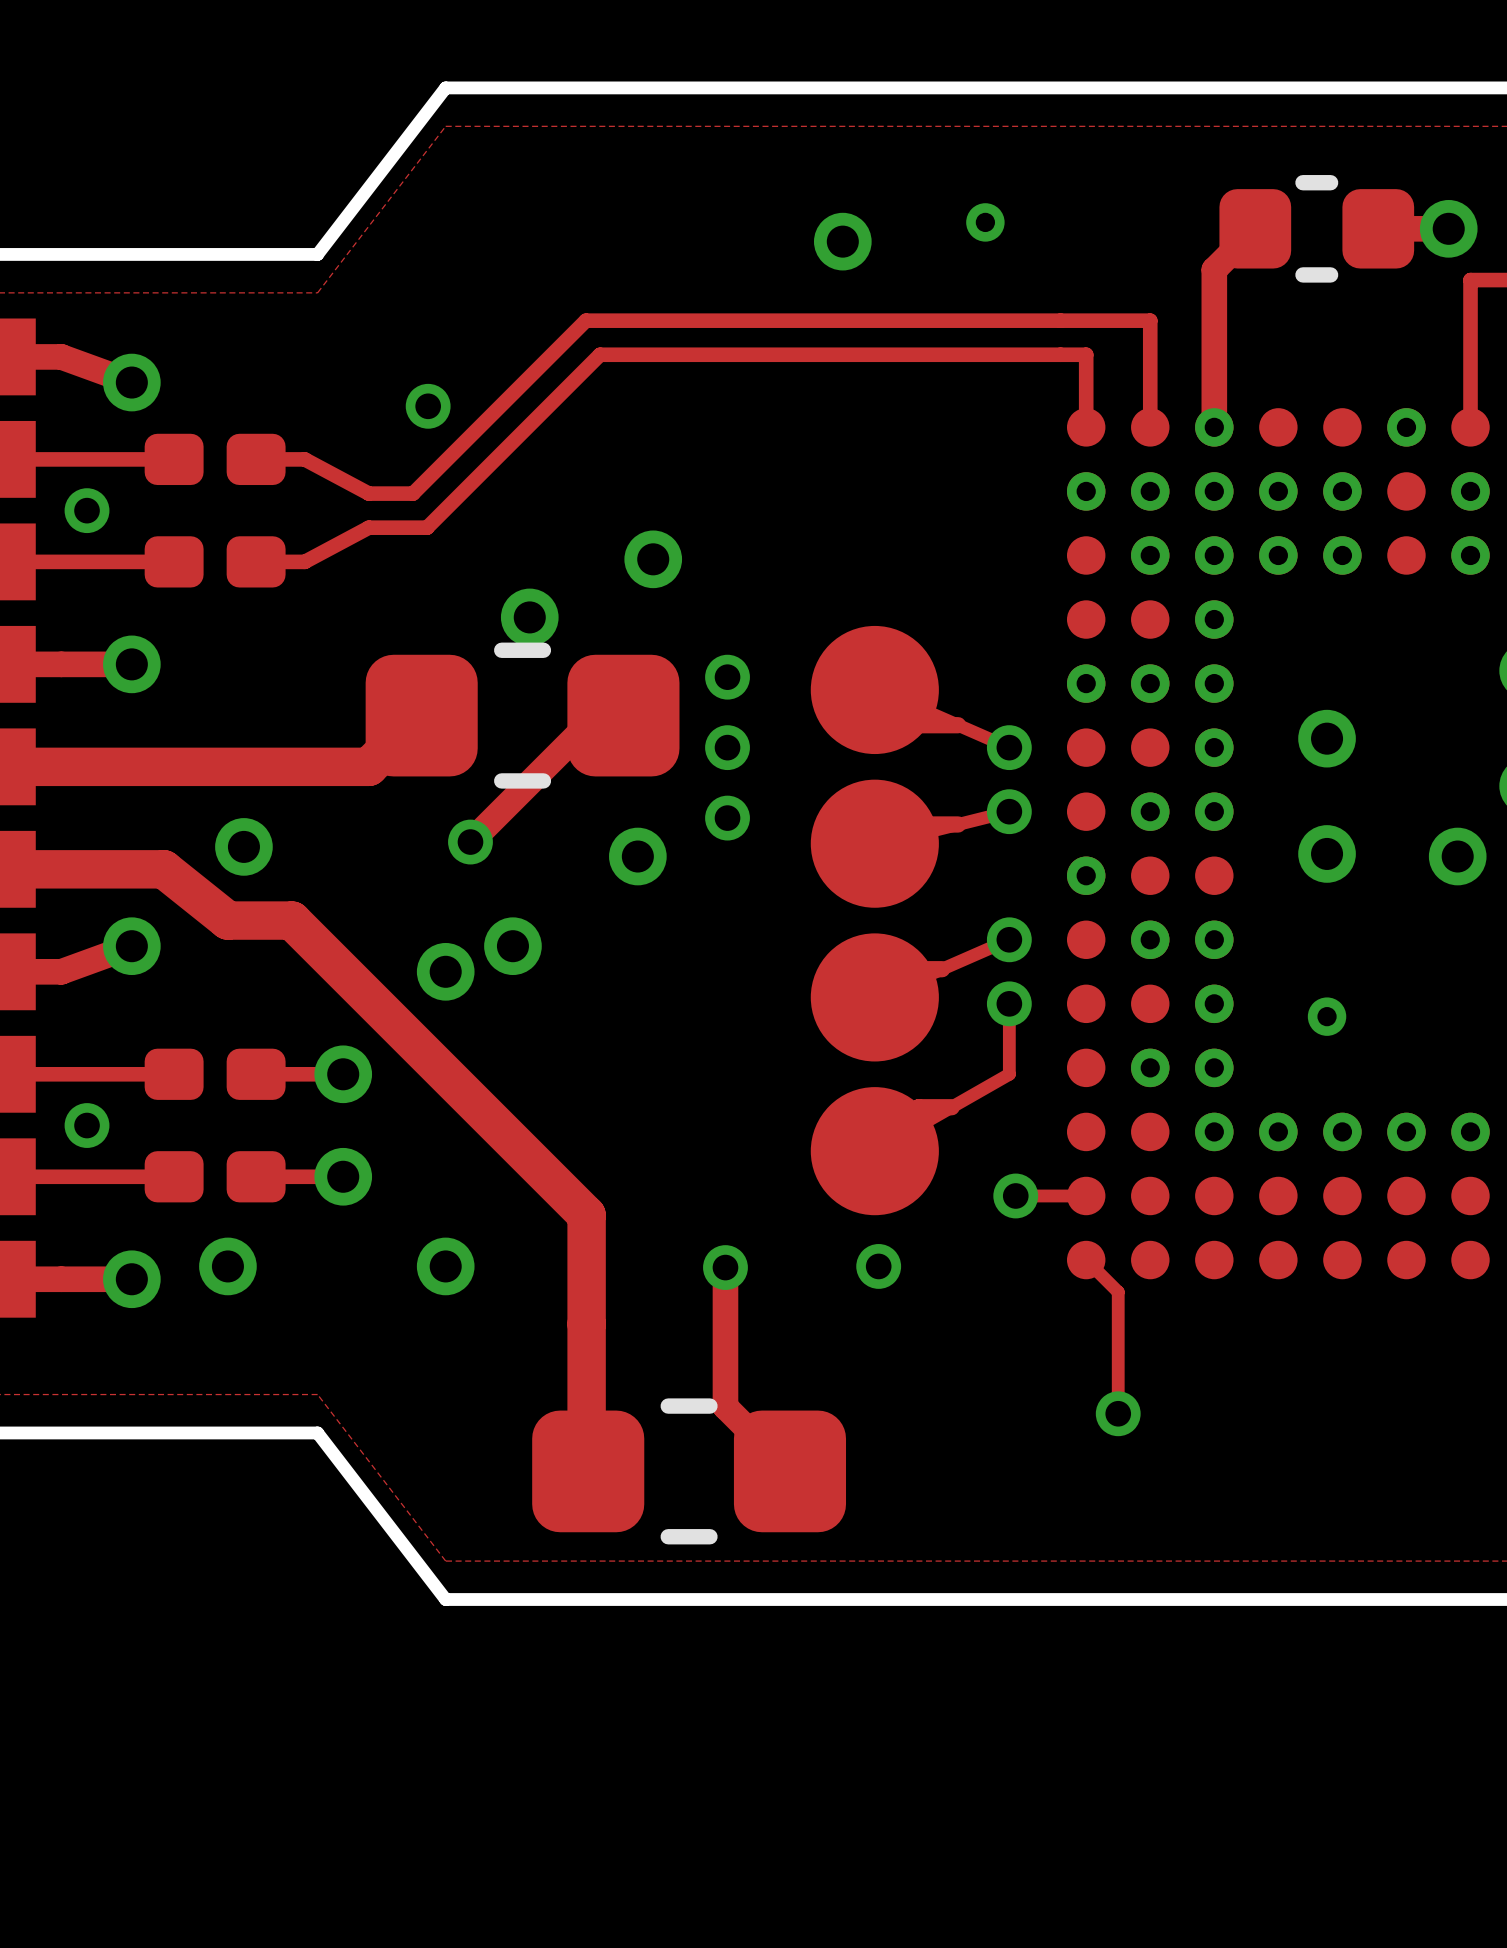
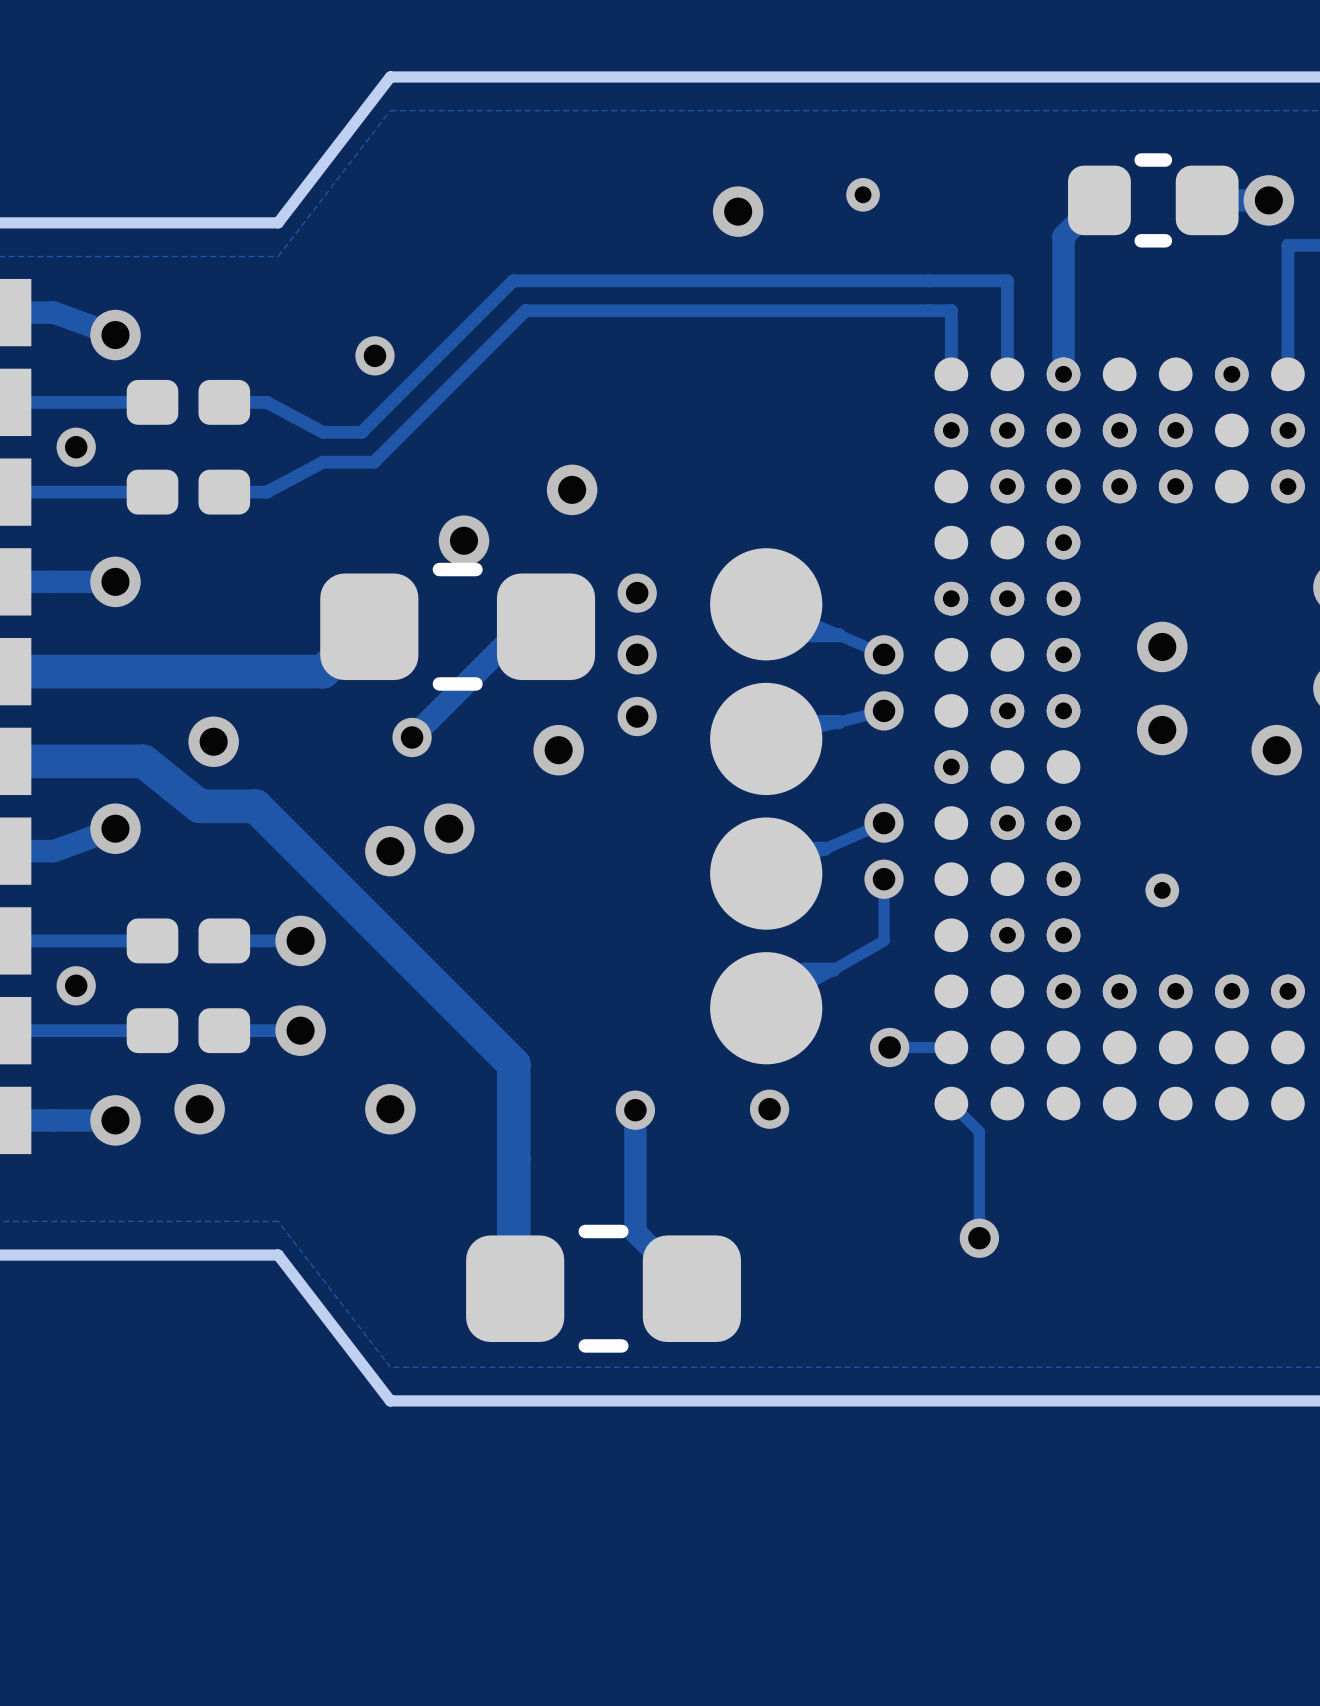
via position: (1327, 853) -> (1162, 729)

